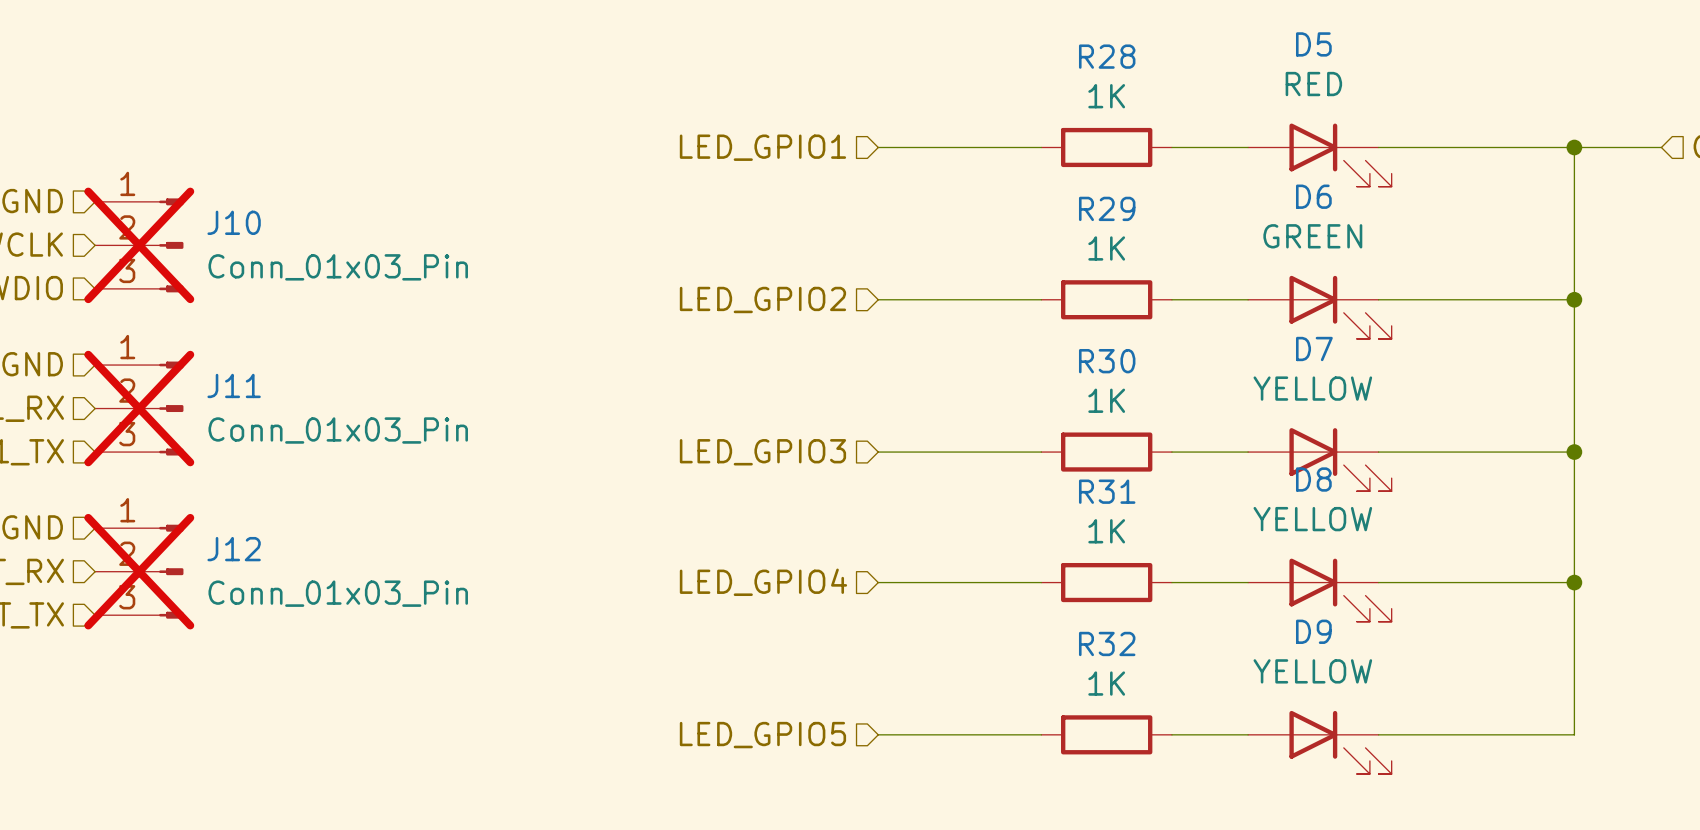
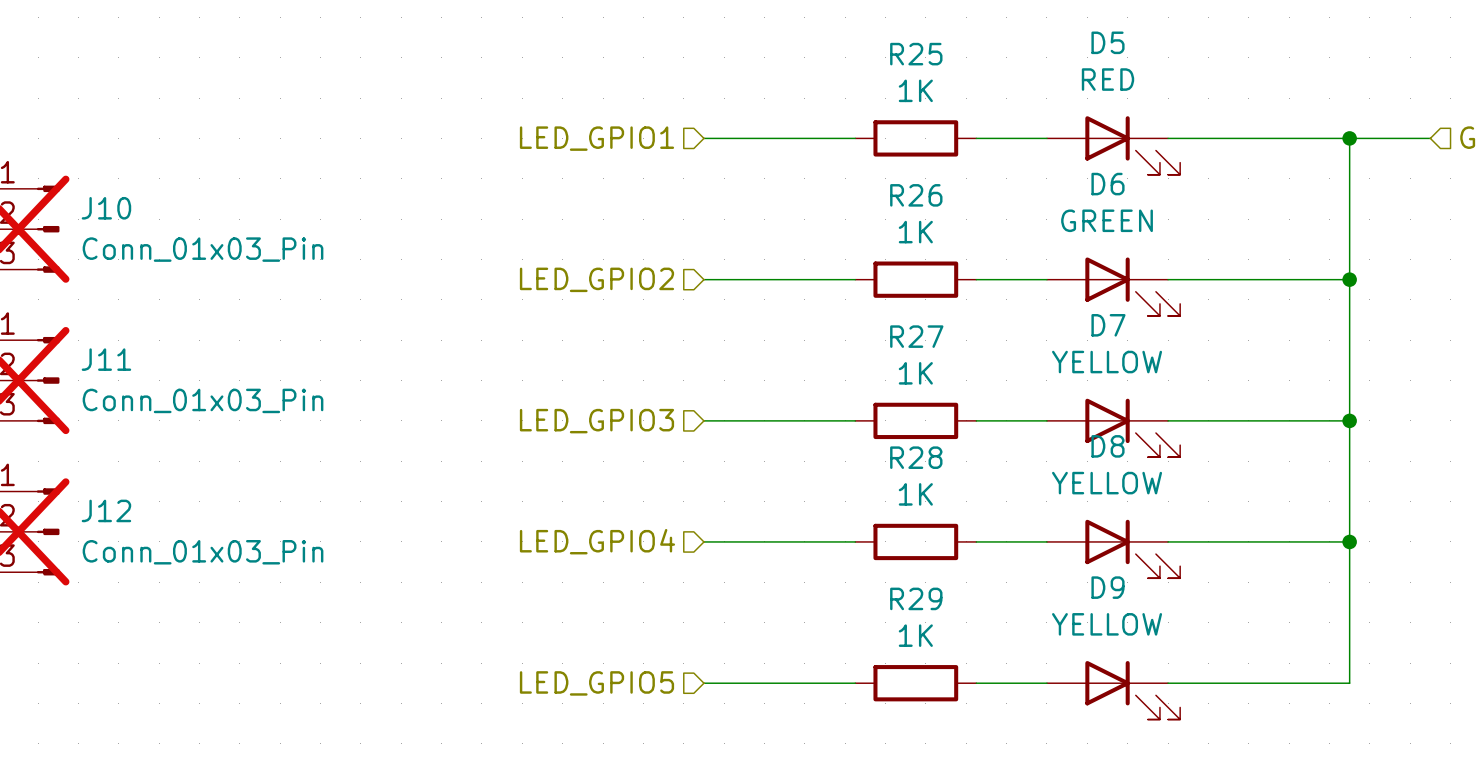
R28 name: R28 (1107, 56) -> R25 (916, 54)
R29 name: R29 (1107, 208) -> R26 (916, 195)
R30 name: R30 (1107, 361) -> R27 (916, 336)
R31 name: R31 (1107, 491) -> R28 (916, 457)
R32 name: R32 (1107, 643) -> R29 (916, 598)

